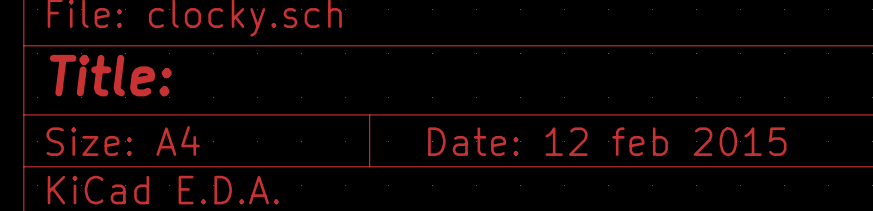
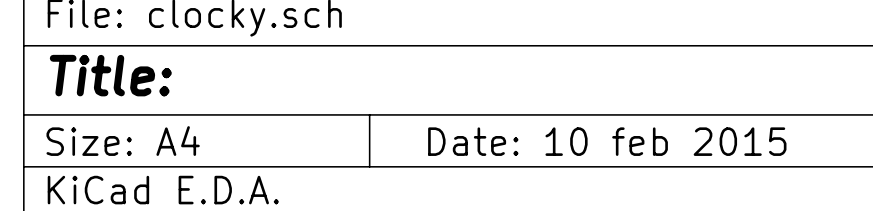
title block: Date: 12 feb 2015 (607, 141) -> Date: 10 feb 2015 (607, 141)

